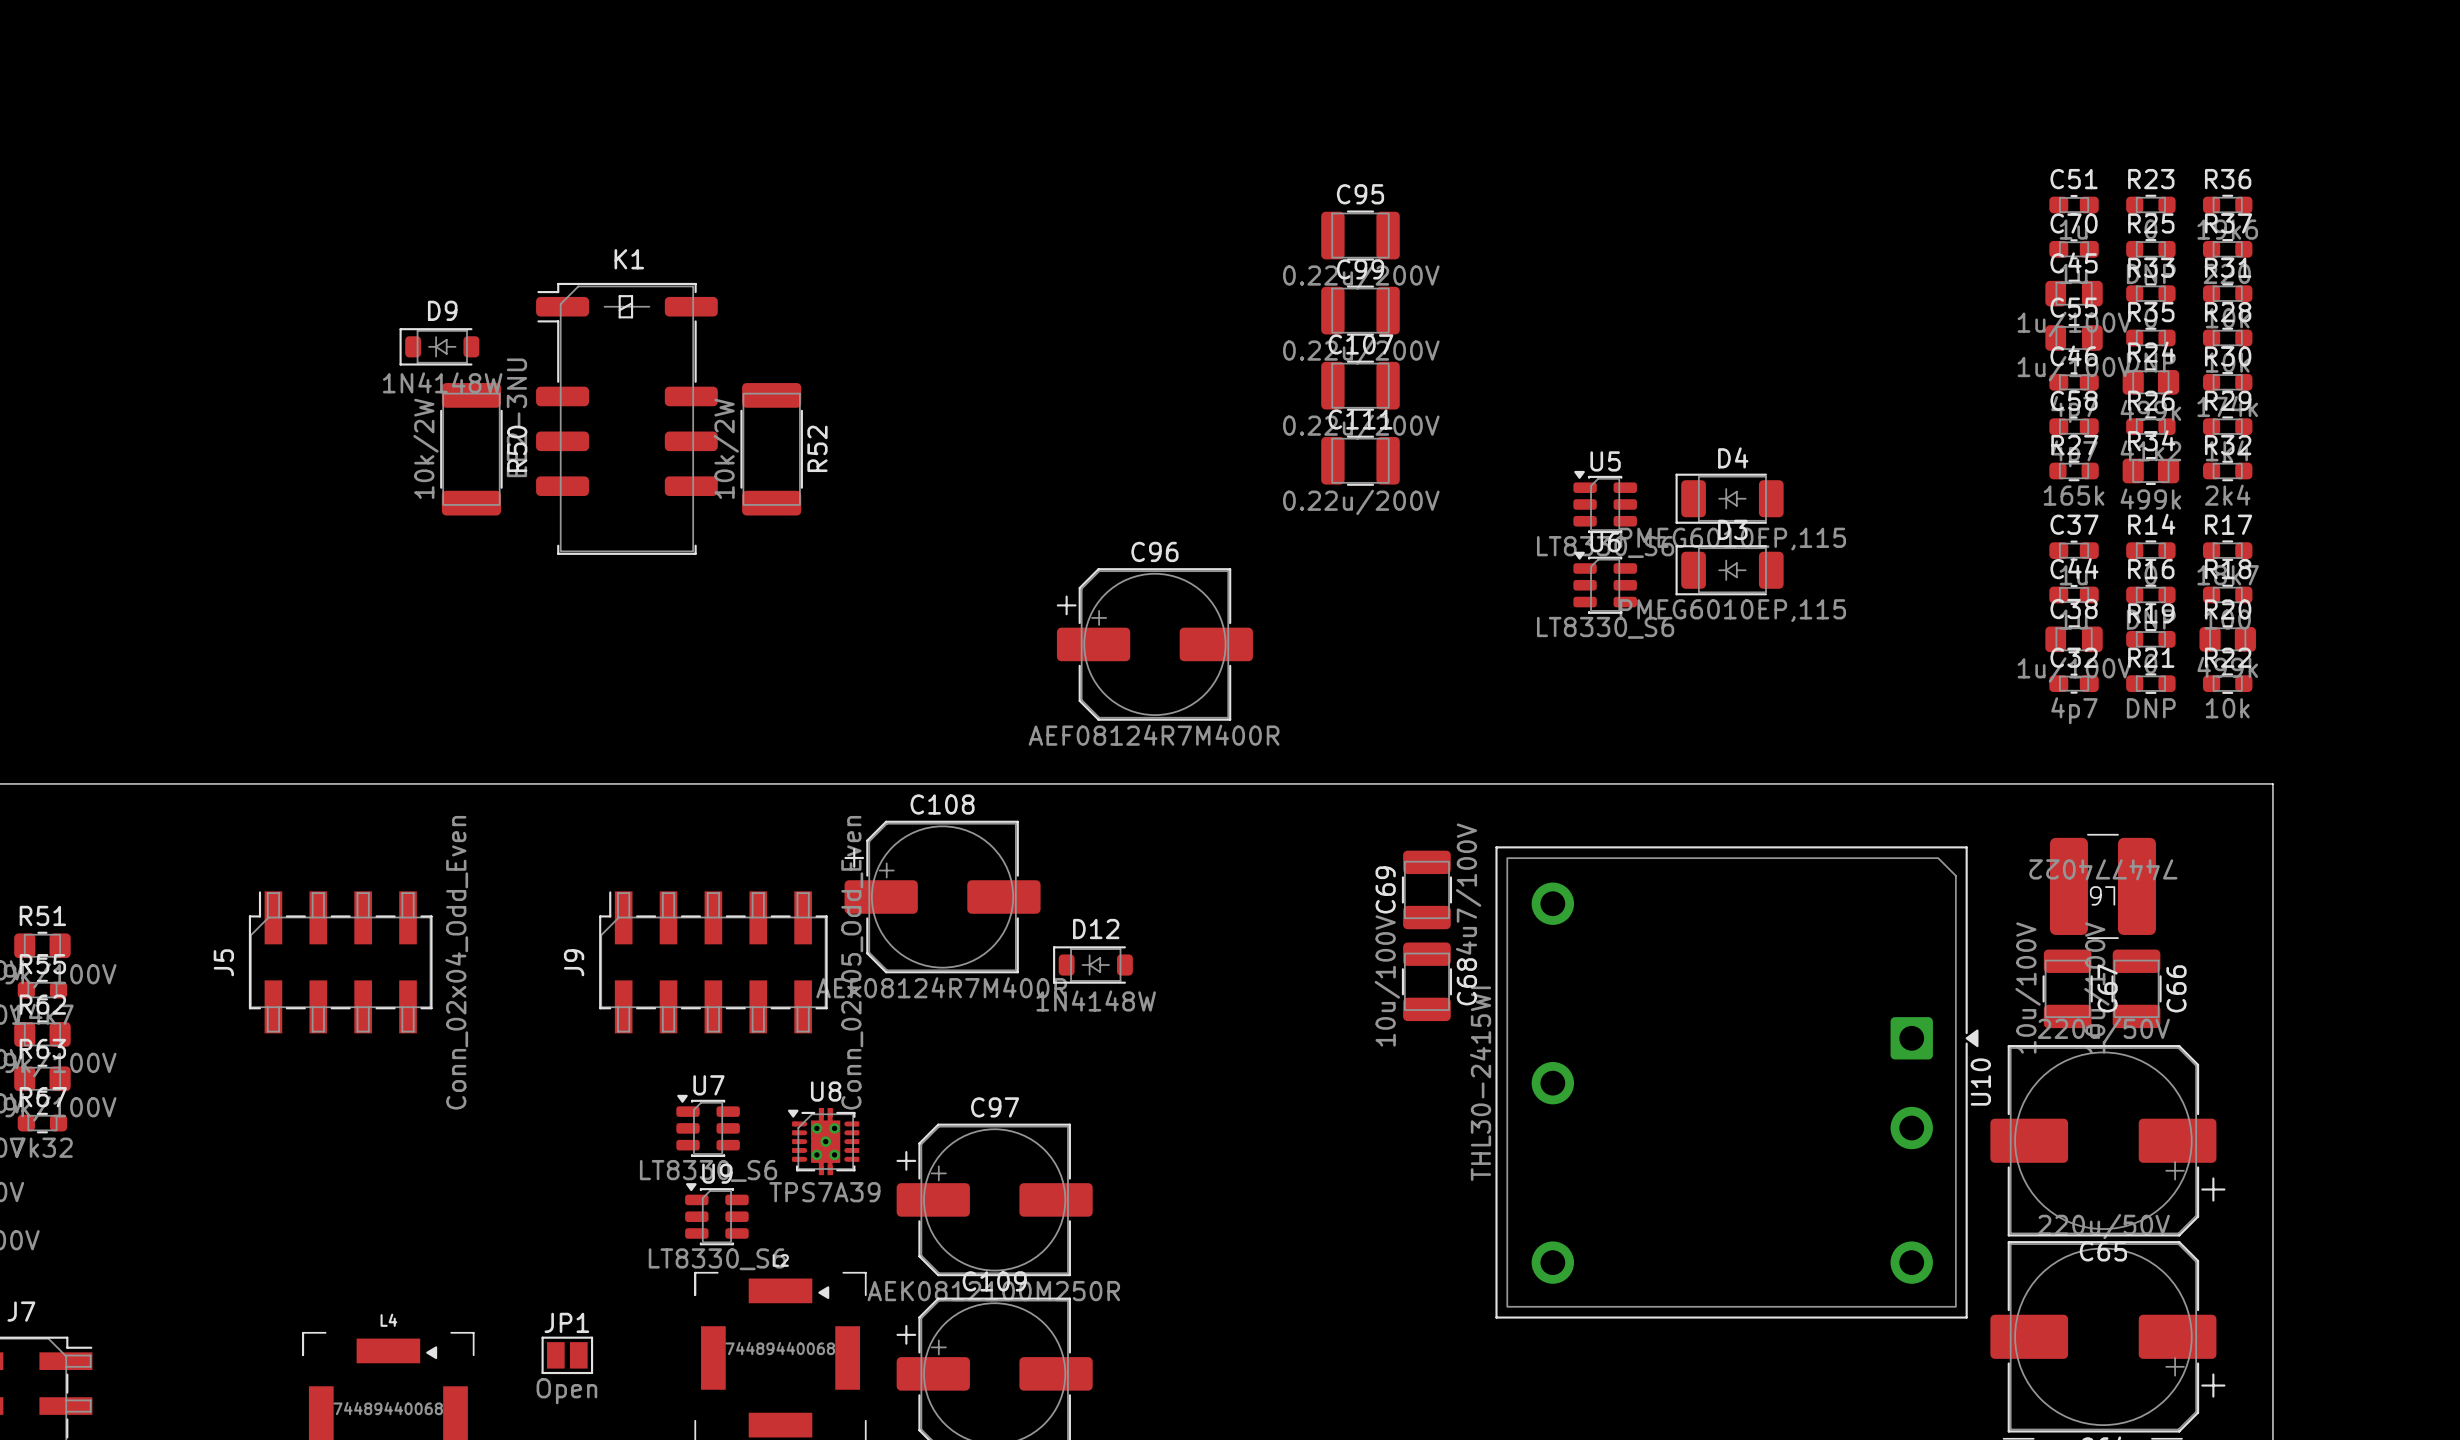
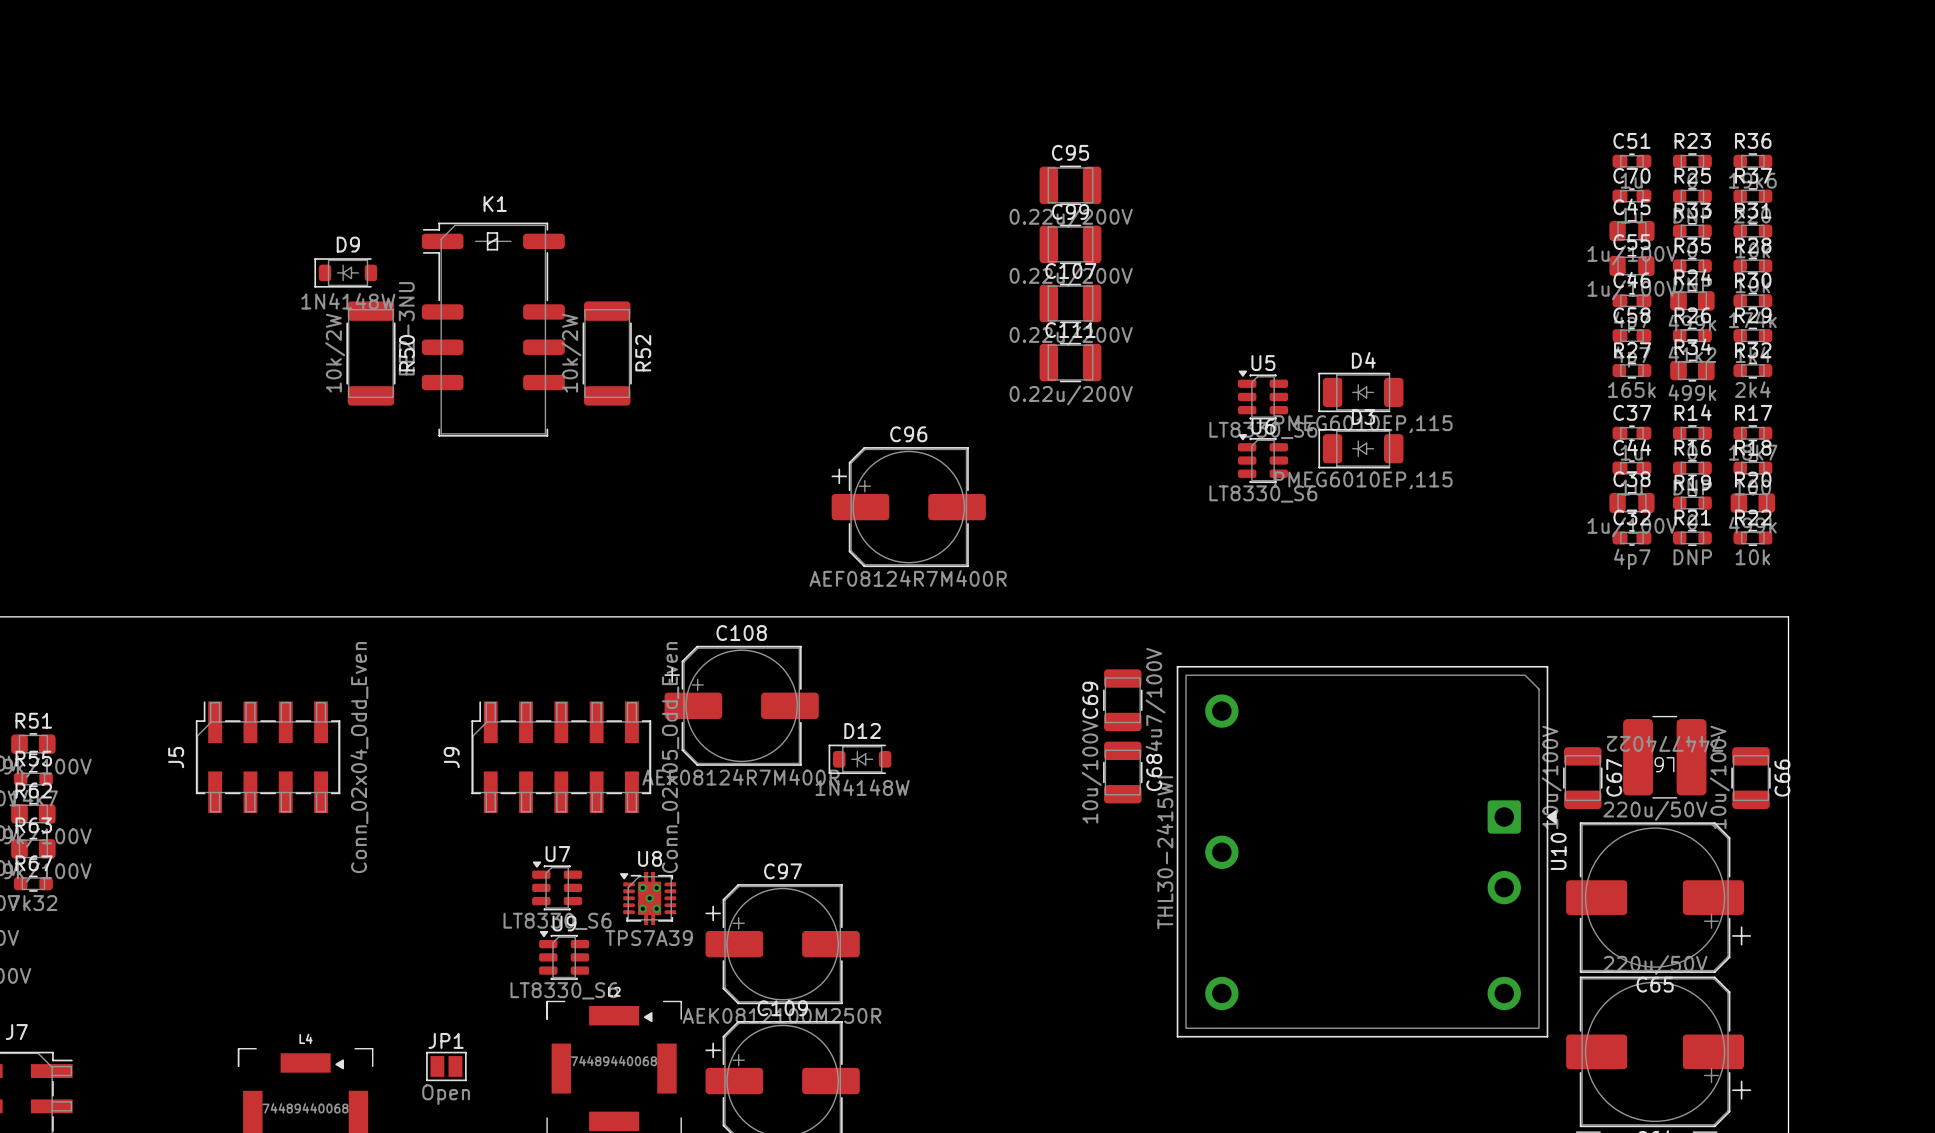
L6 position: (2102, 886) -> (1664, 757)
C67 position: (2067, 988) -> (1582, 778)
C66 position: (2136, 988) -> (1750, 778)

